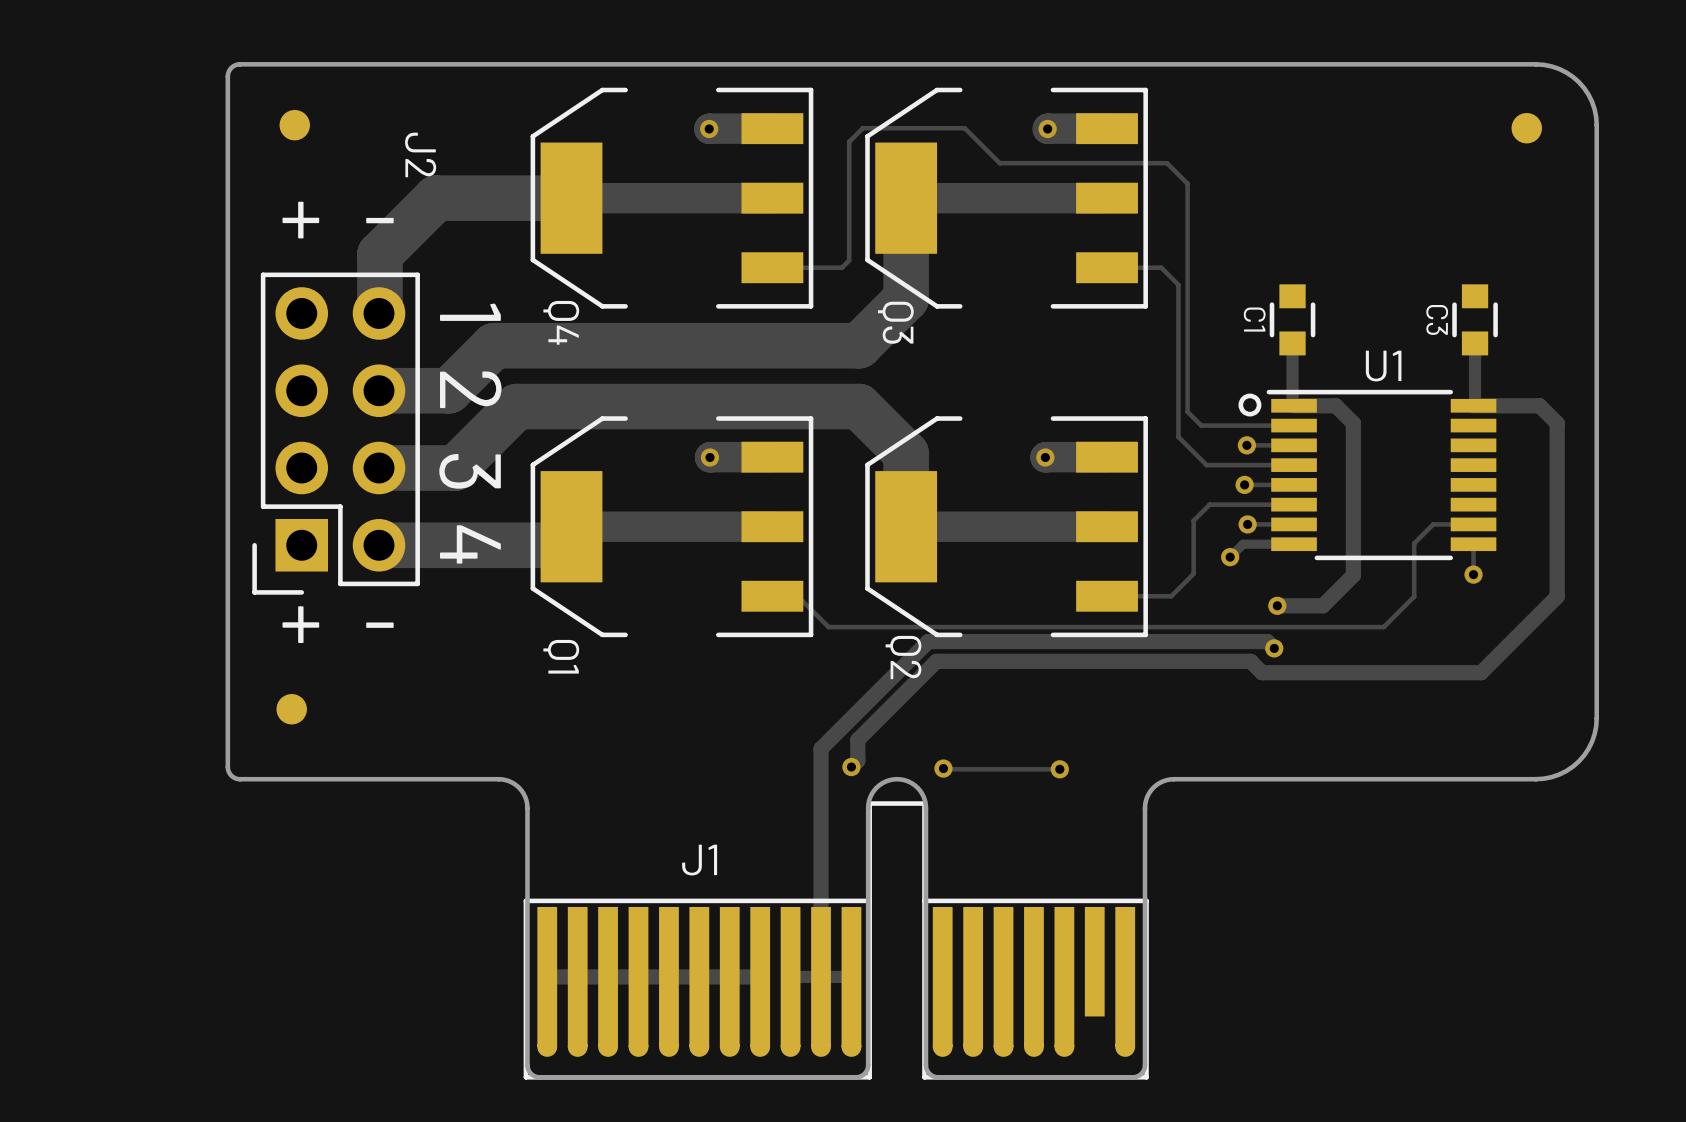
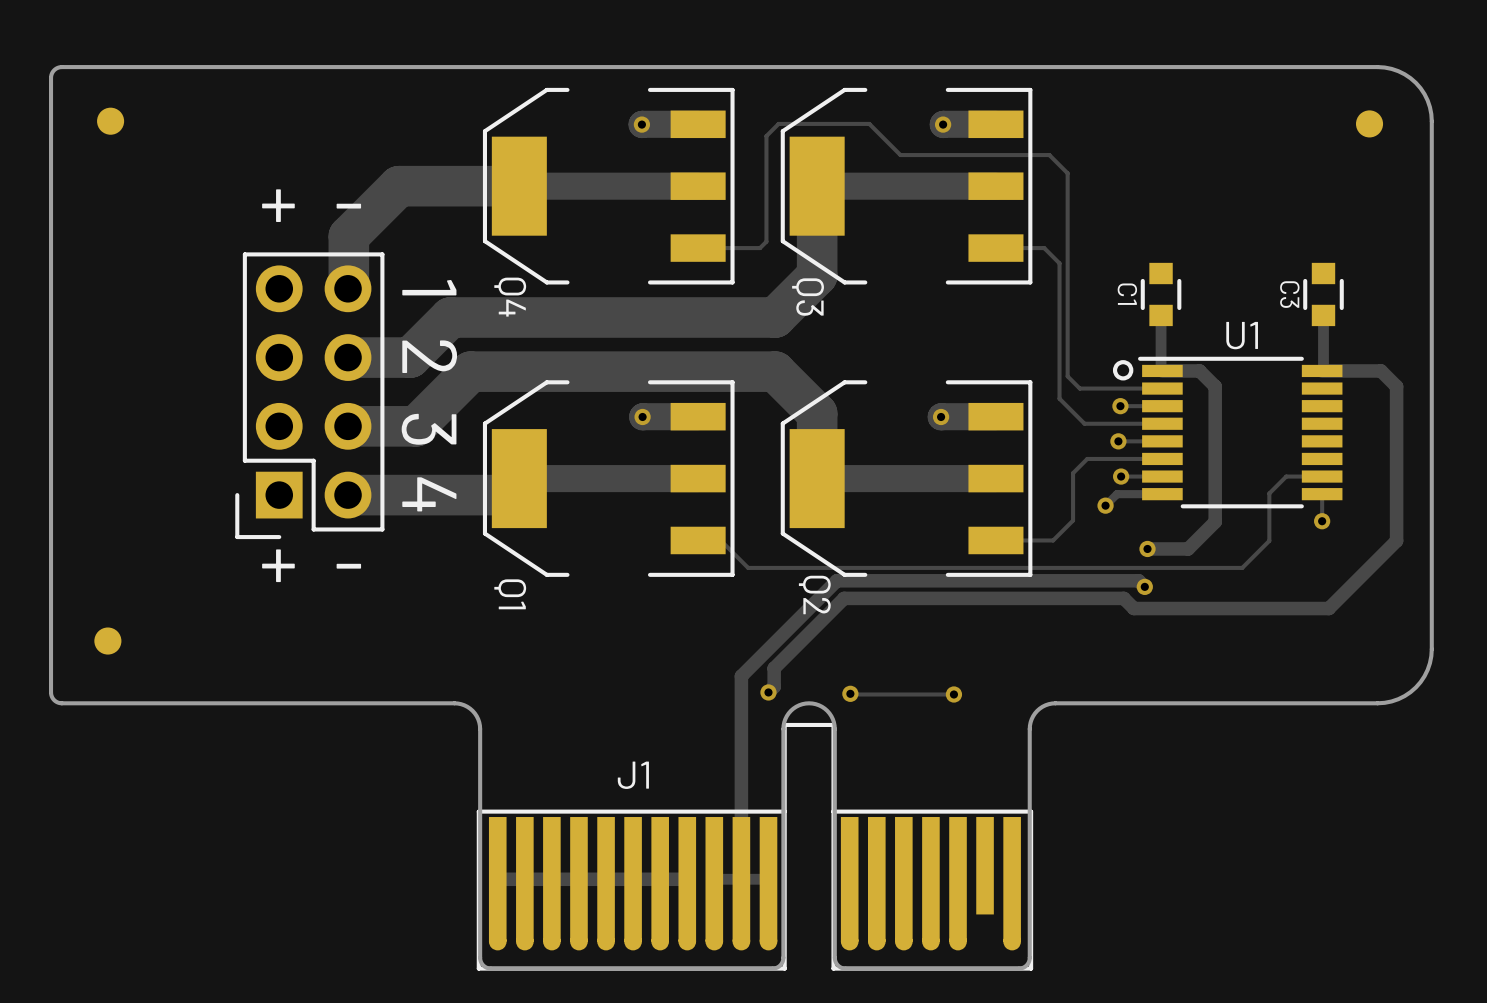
board edge: (240, 64) (231, 67) (227, 76) (227, 767) (231, 775) (240, 779) -> (224, 67) (61, 67) (54, 70) (51, 77) (51, 695) (55, 701) (61, 703) (224, 703)
part position: (294, 125) -> (110, 121)
J2 name: J2 (420, 154) -> none
part position: (291, 709) -> (107, 641)

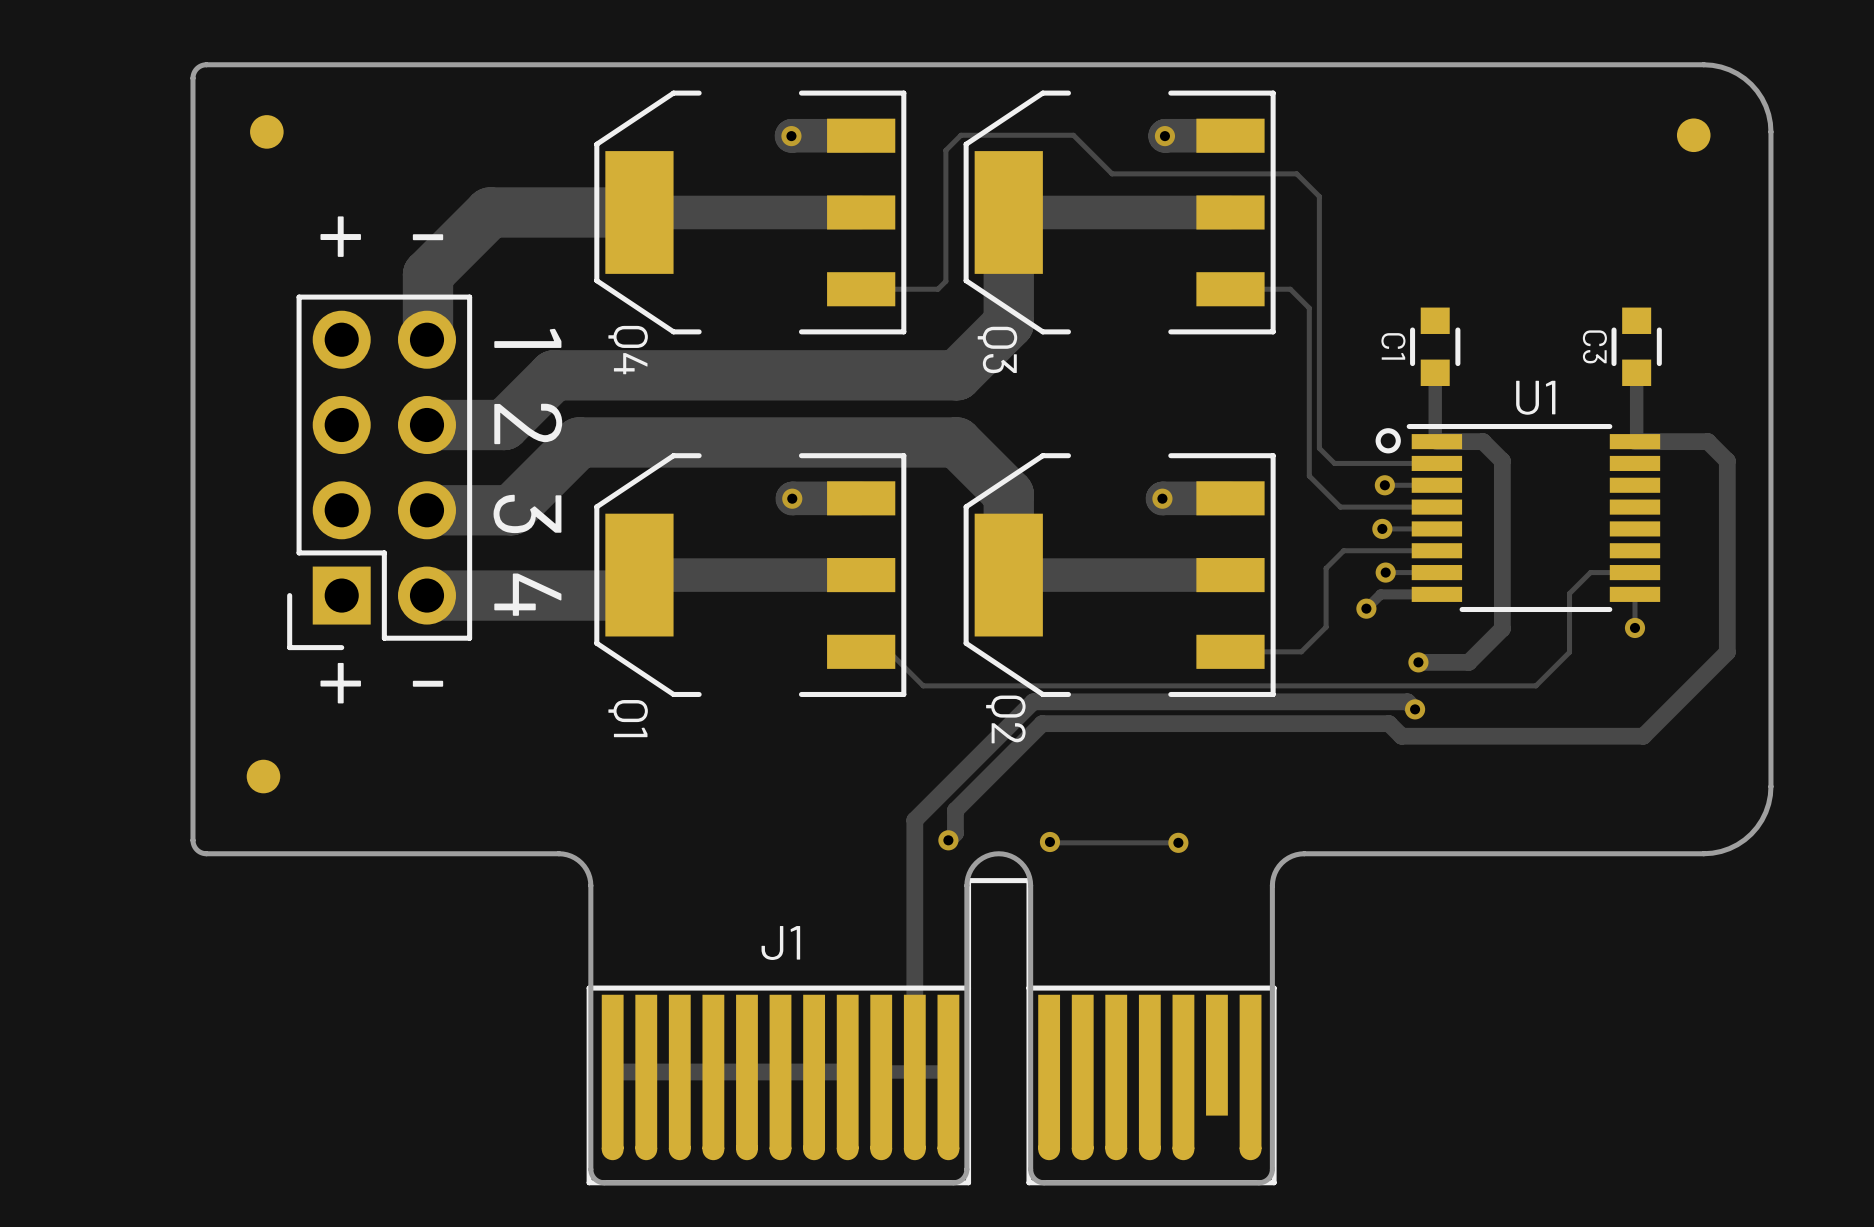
board edge: (170, 67) (60, 67) (54, 70) (51, 77) (51, 693) (54, 700) (60, 703) (170, 703) -> (206, 64) (196, 68) (192, 78) (192, 840) (196, 849) (206, 853)
part position: (110, 121) -> (266, 131)
part position: (107, 641) -> (263, 776)

